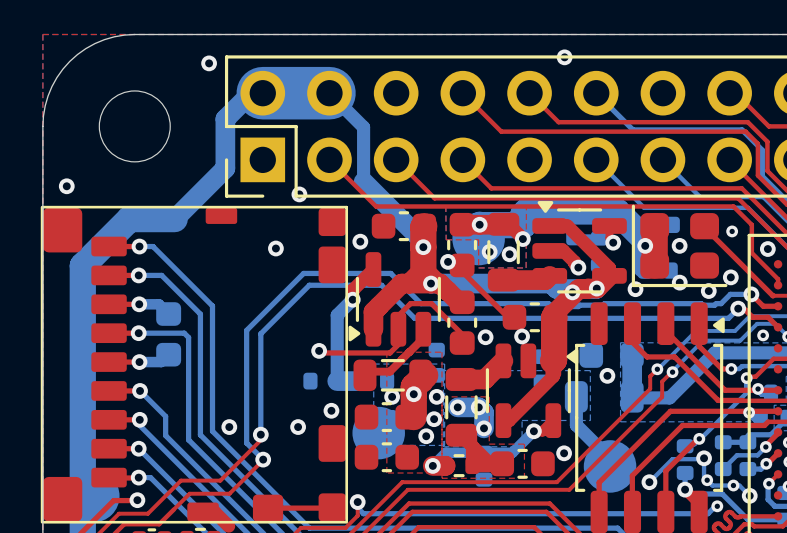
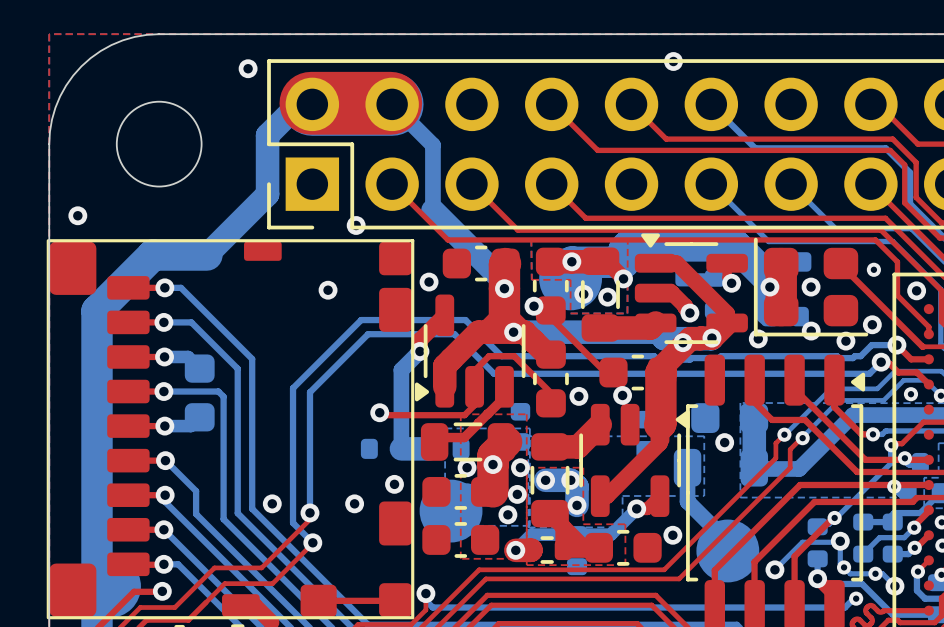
top track: none -> (310, 103) (390, 103)

